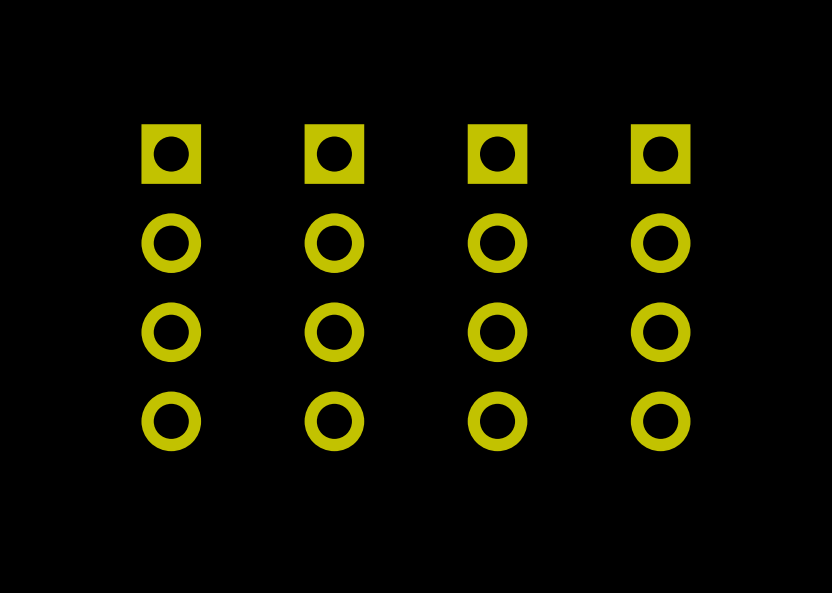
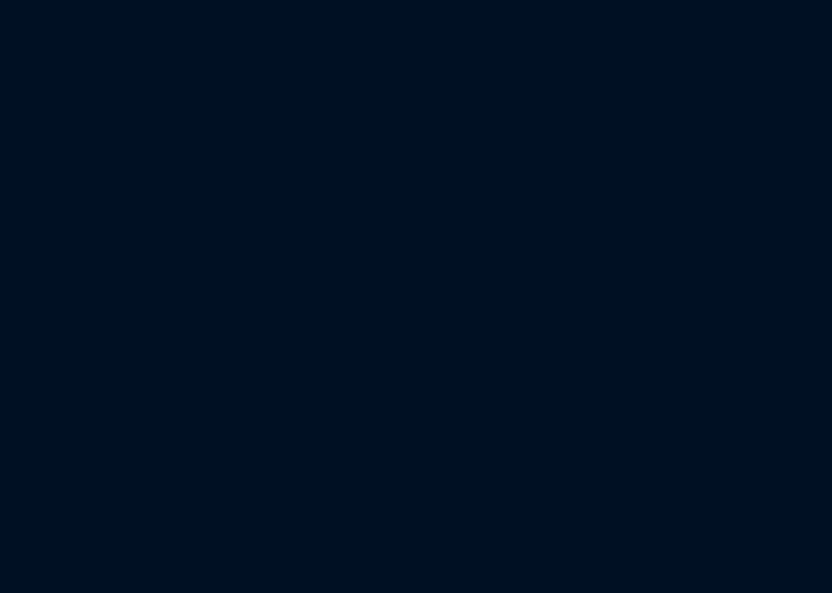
part: (171, 287) -> none
part: (334, 287) -> none
part: (497, 287) -> none
part: (660, 287) -> none

